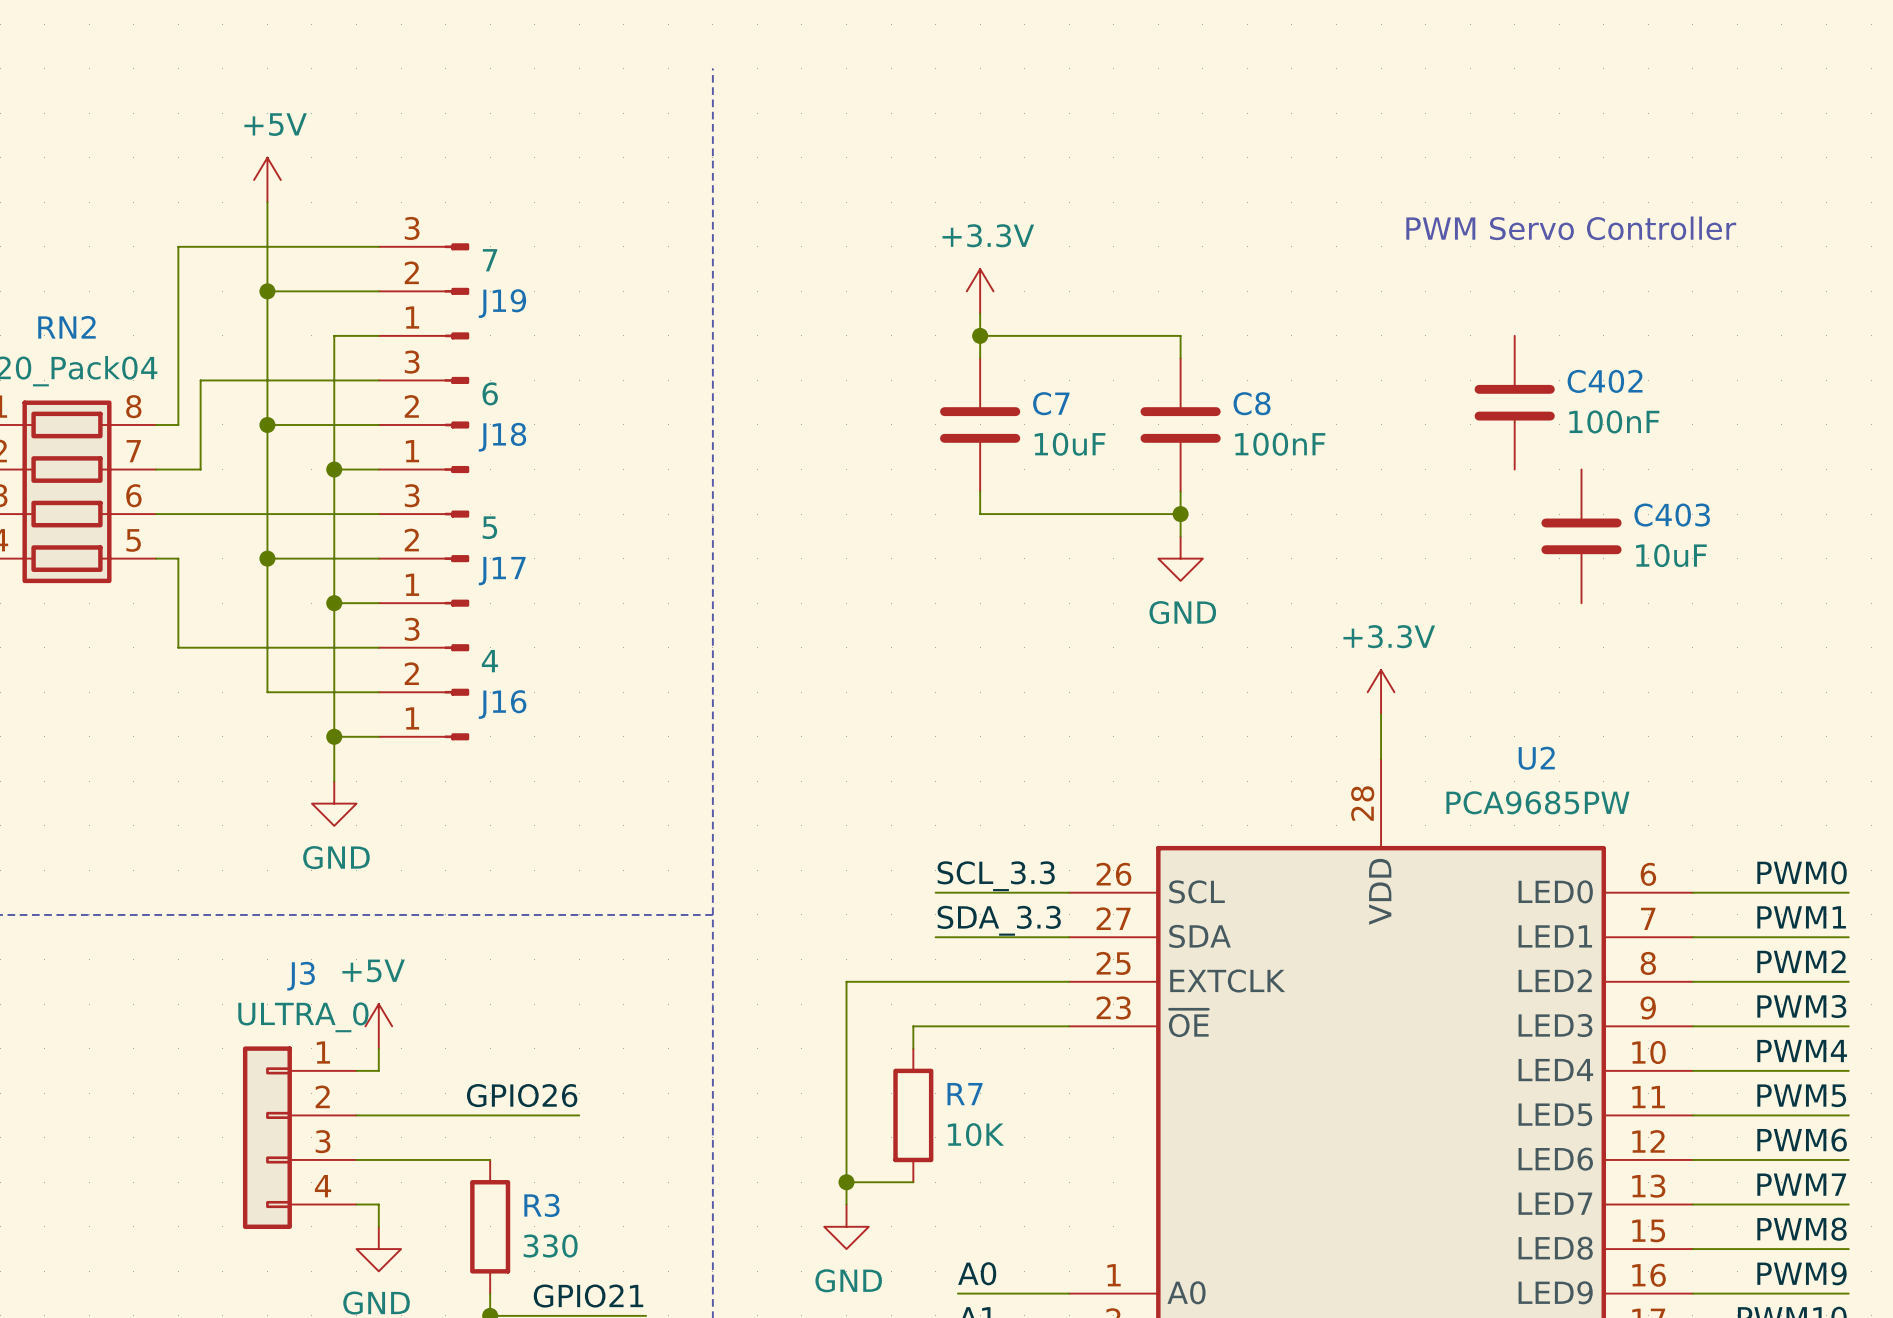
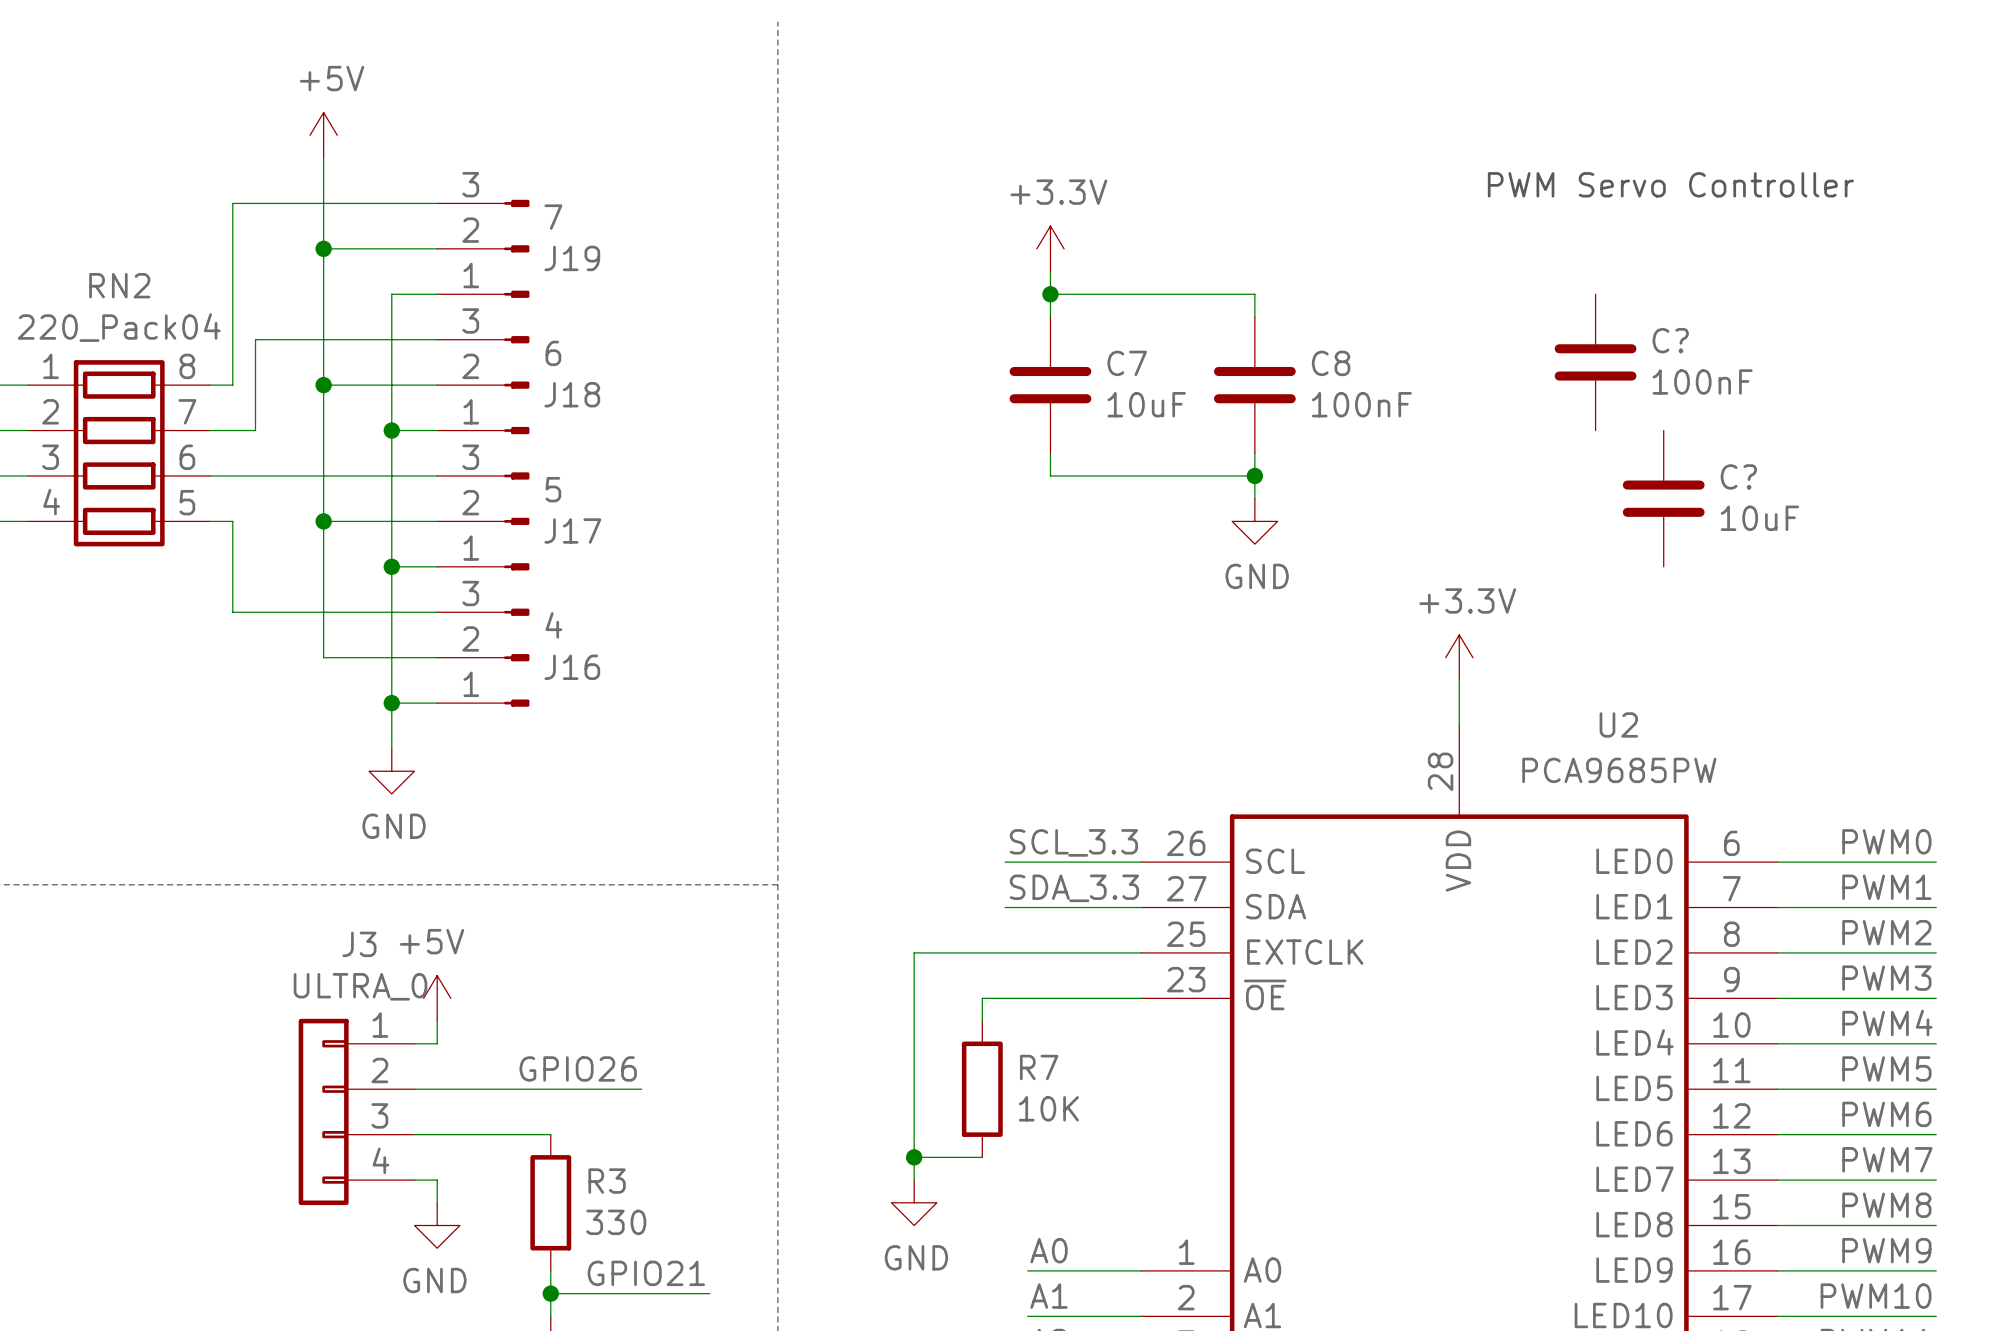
C402 name: C402 (1605, 381) -> C? (1670, 340)
C403 name: C403 (1672, 515) -> C? (1738, 476)

